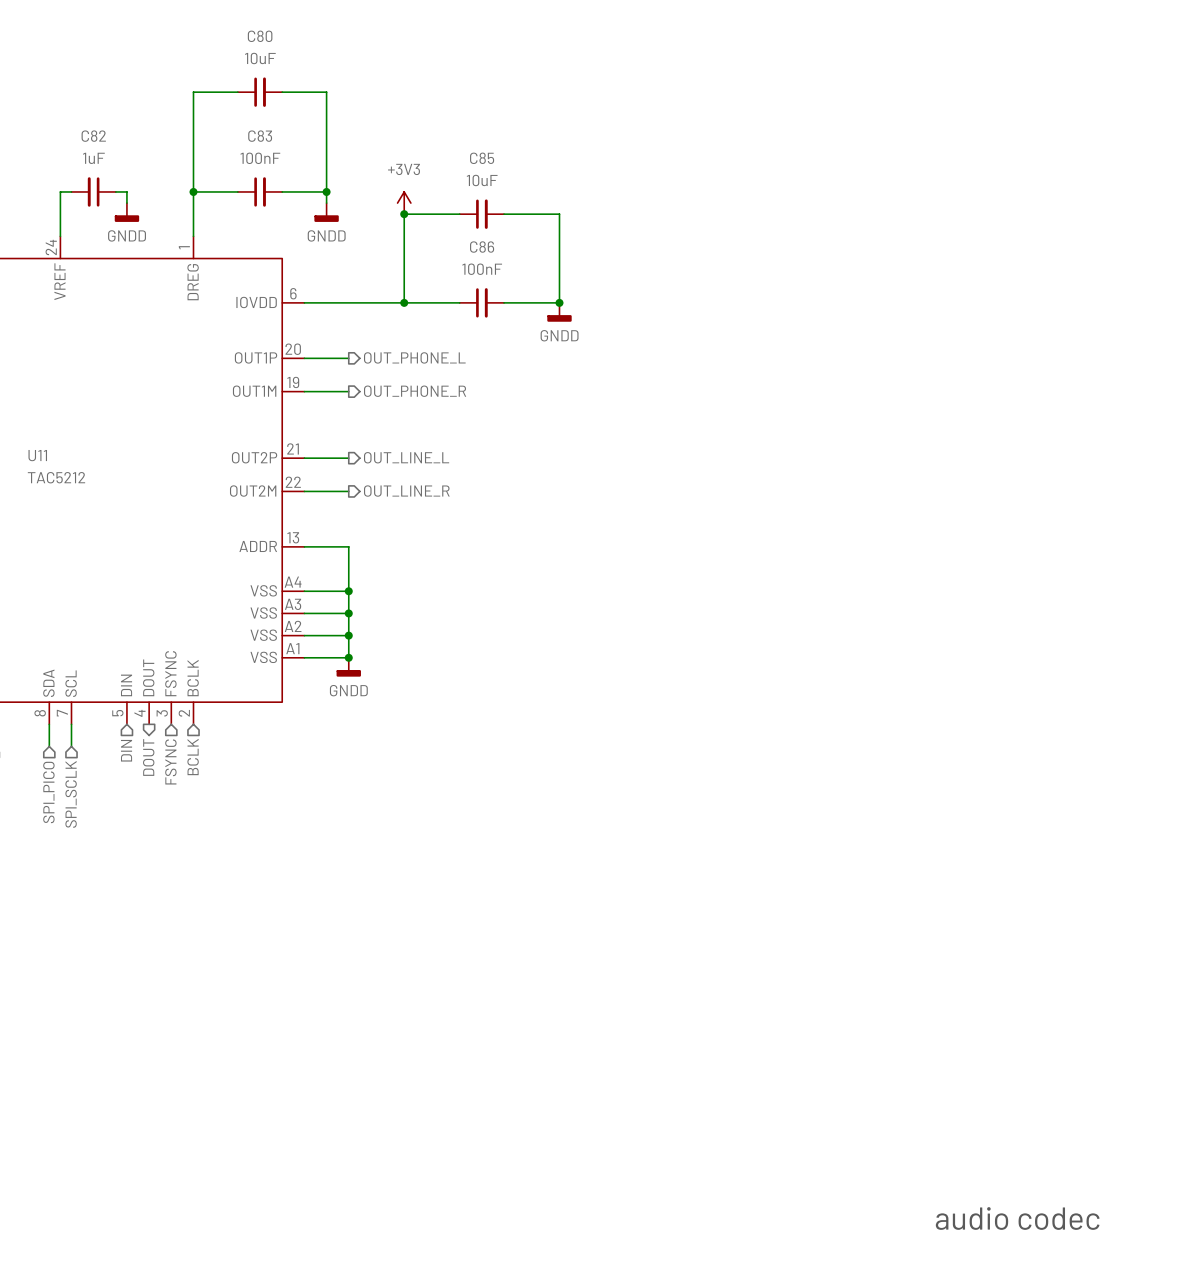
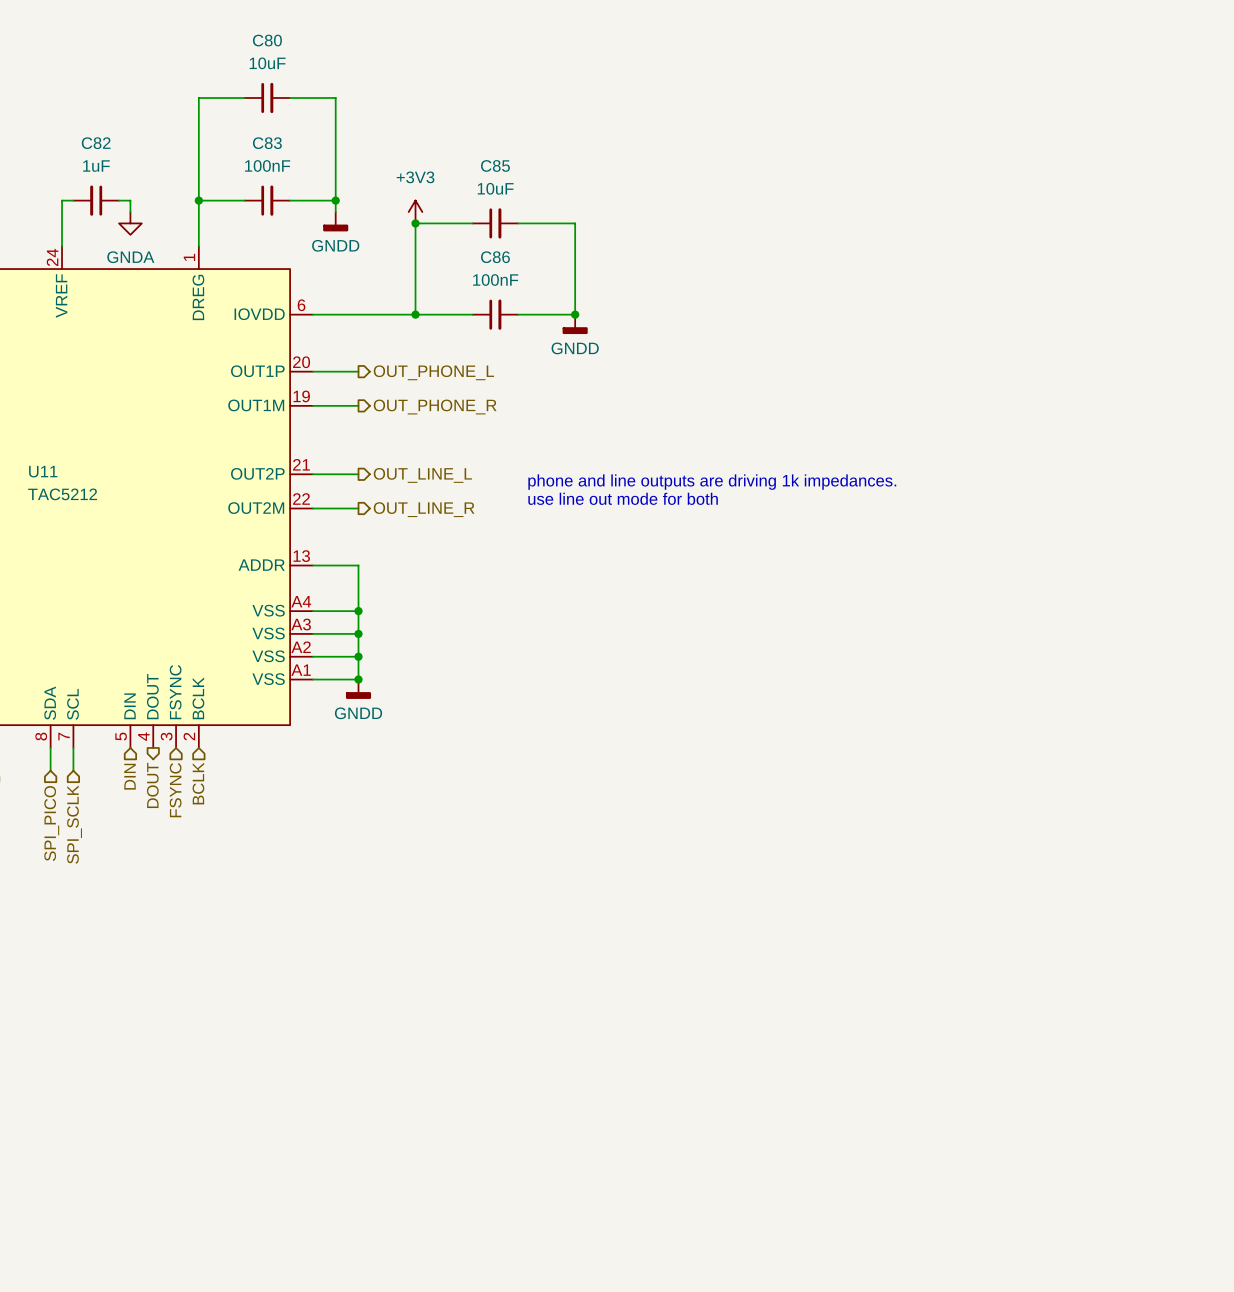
power symbol: GNDD (126, 212) -> GNDA (130, 223)
text: none -> phone and line outputs are driving 1k impedances. (712, 482)
text: none -> use line out mode for both (623, 498)
text: audio codec (1017, 1218) -> none

